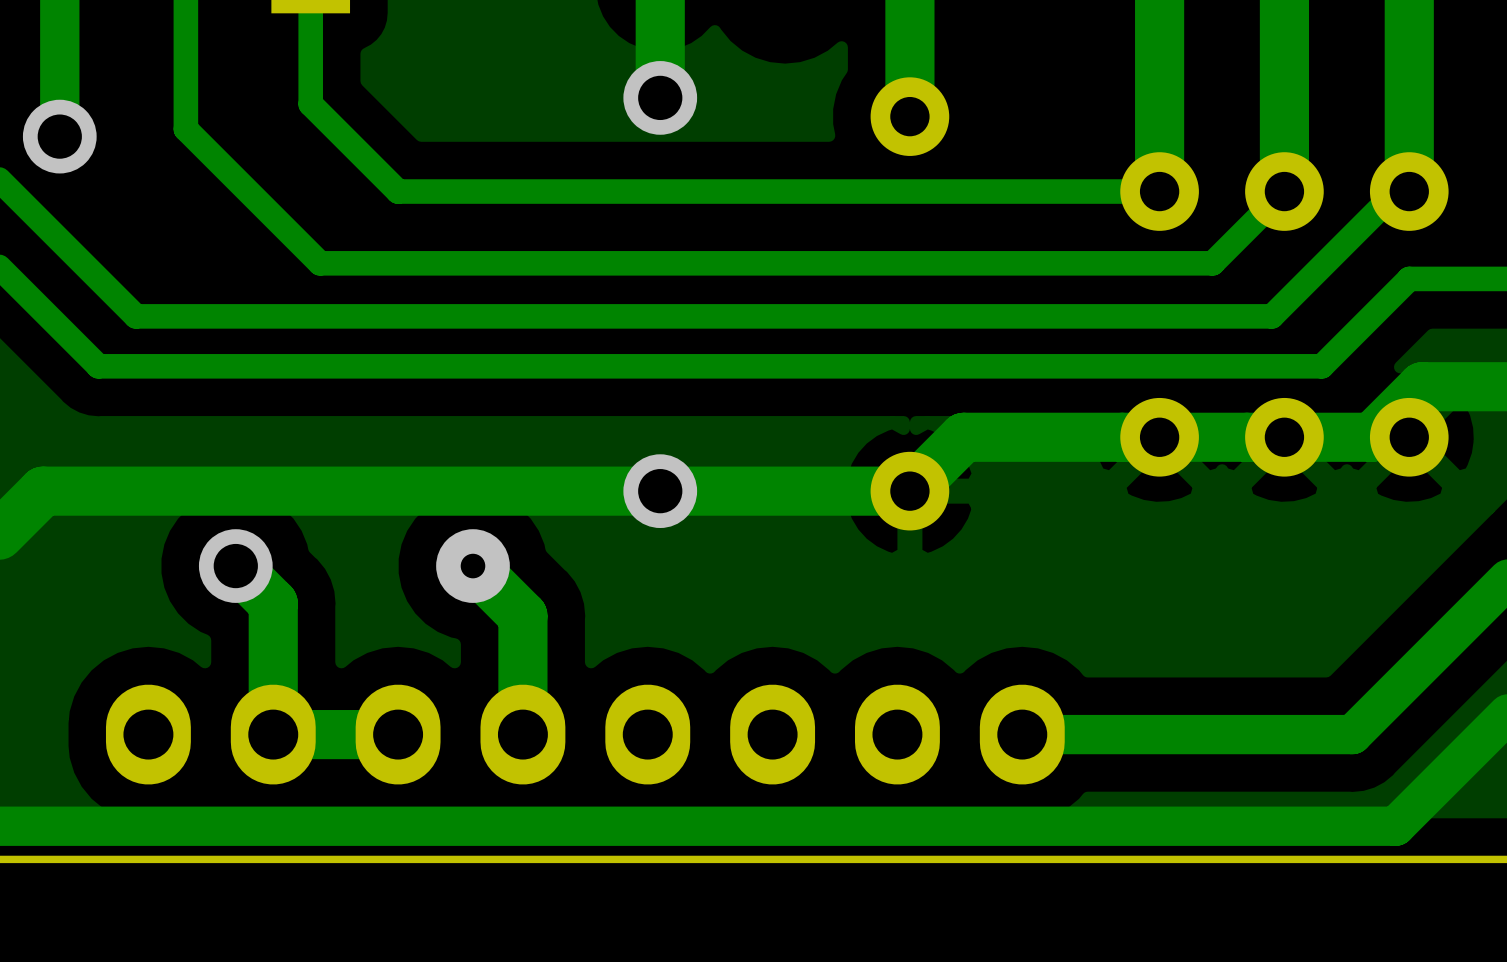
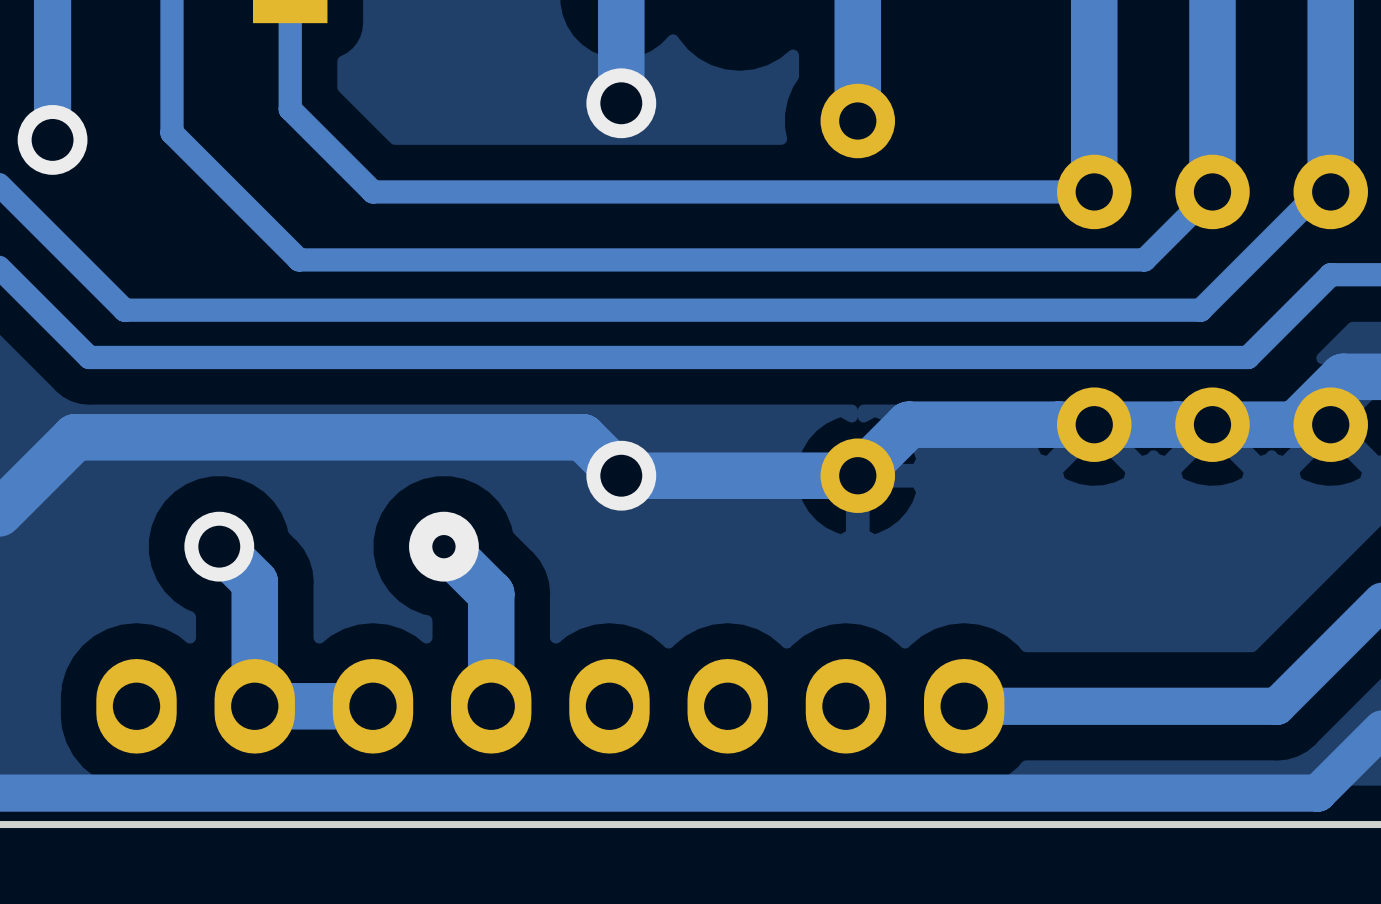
track: (660, 491) (43, 491) -> (621, 475) (582, 437) (75, 437) (36, 475)

